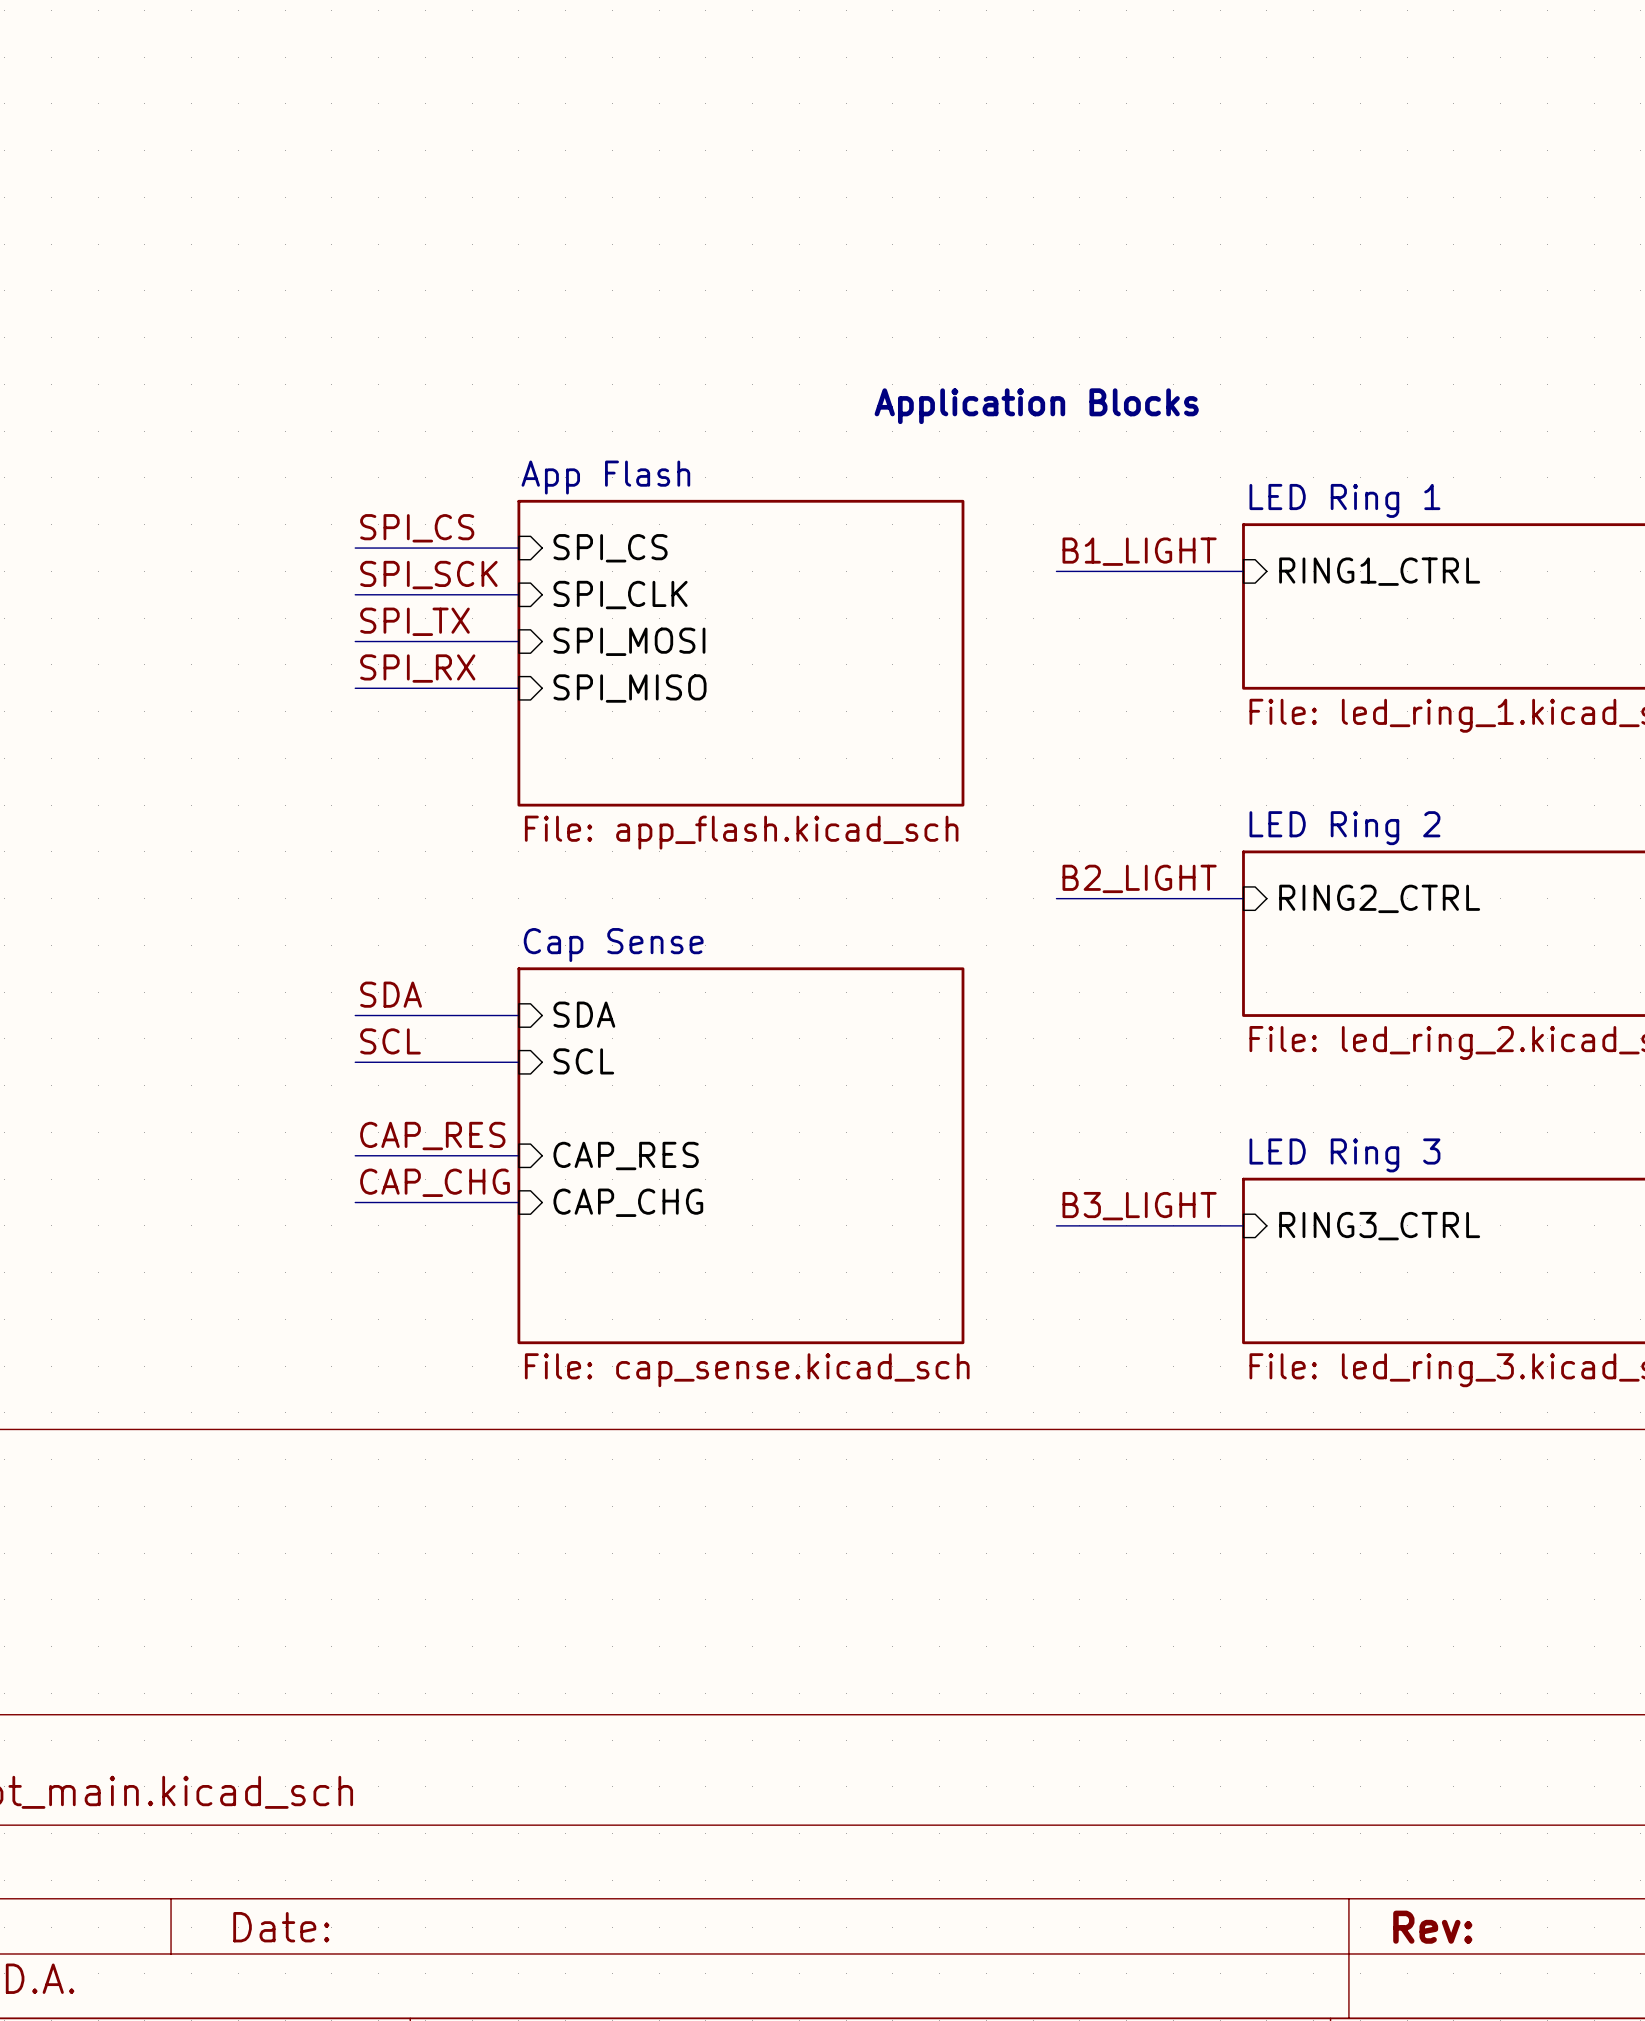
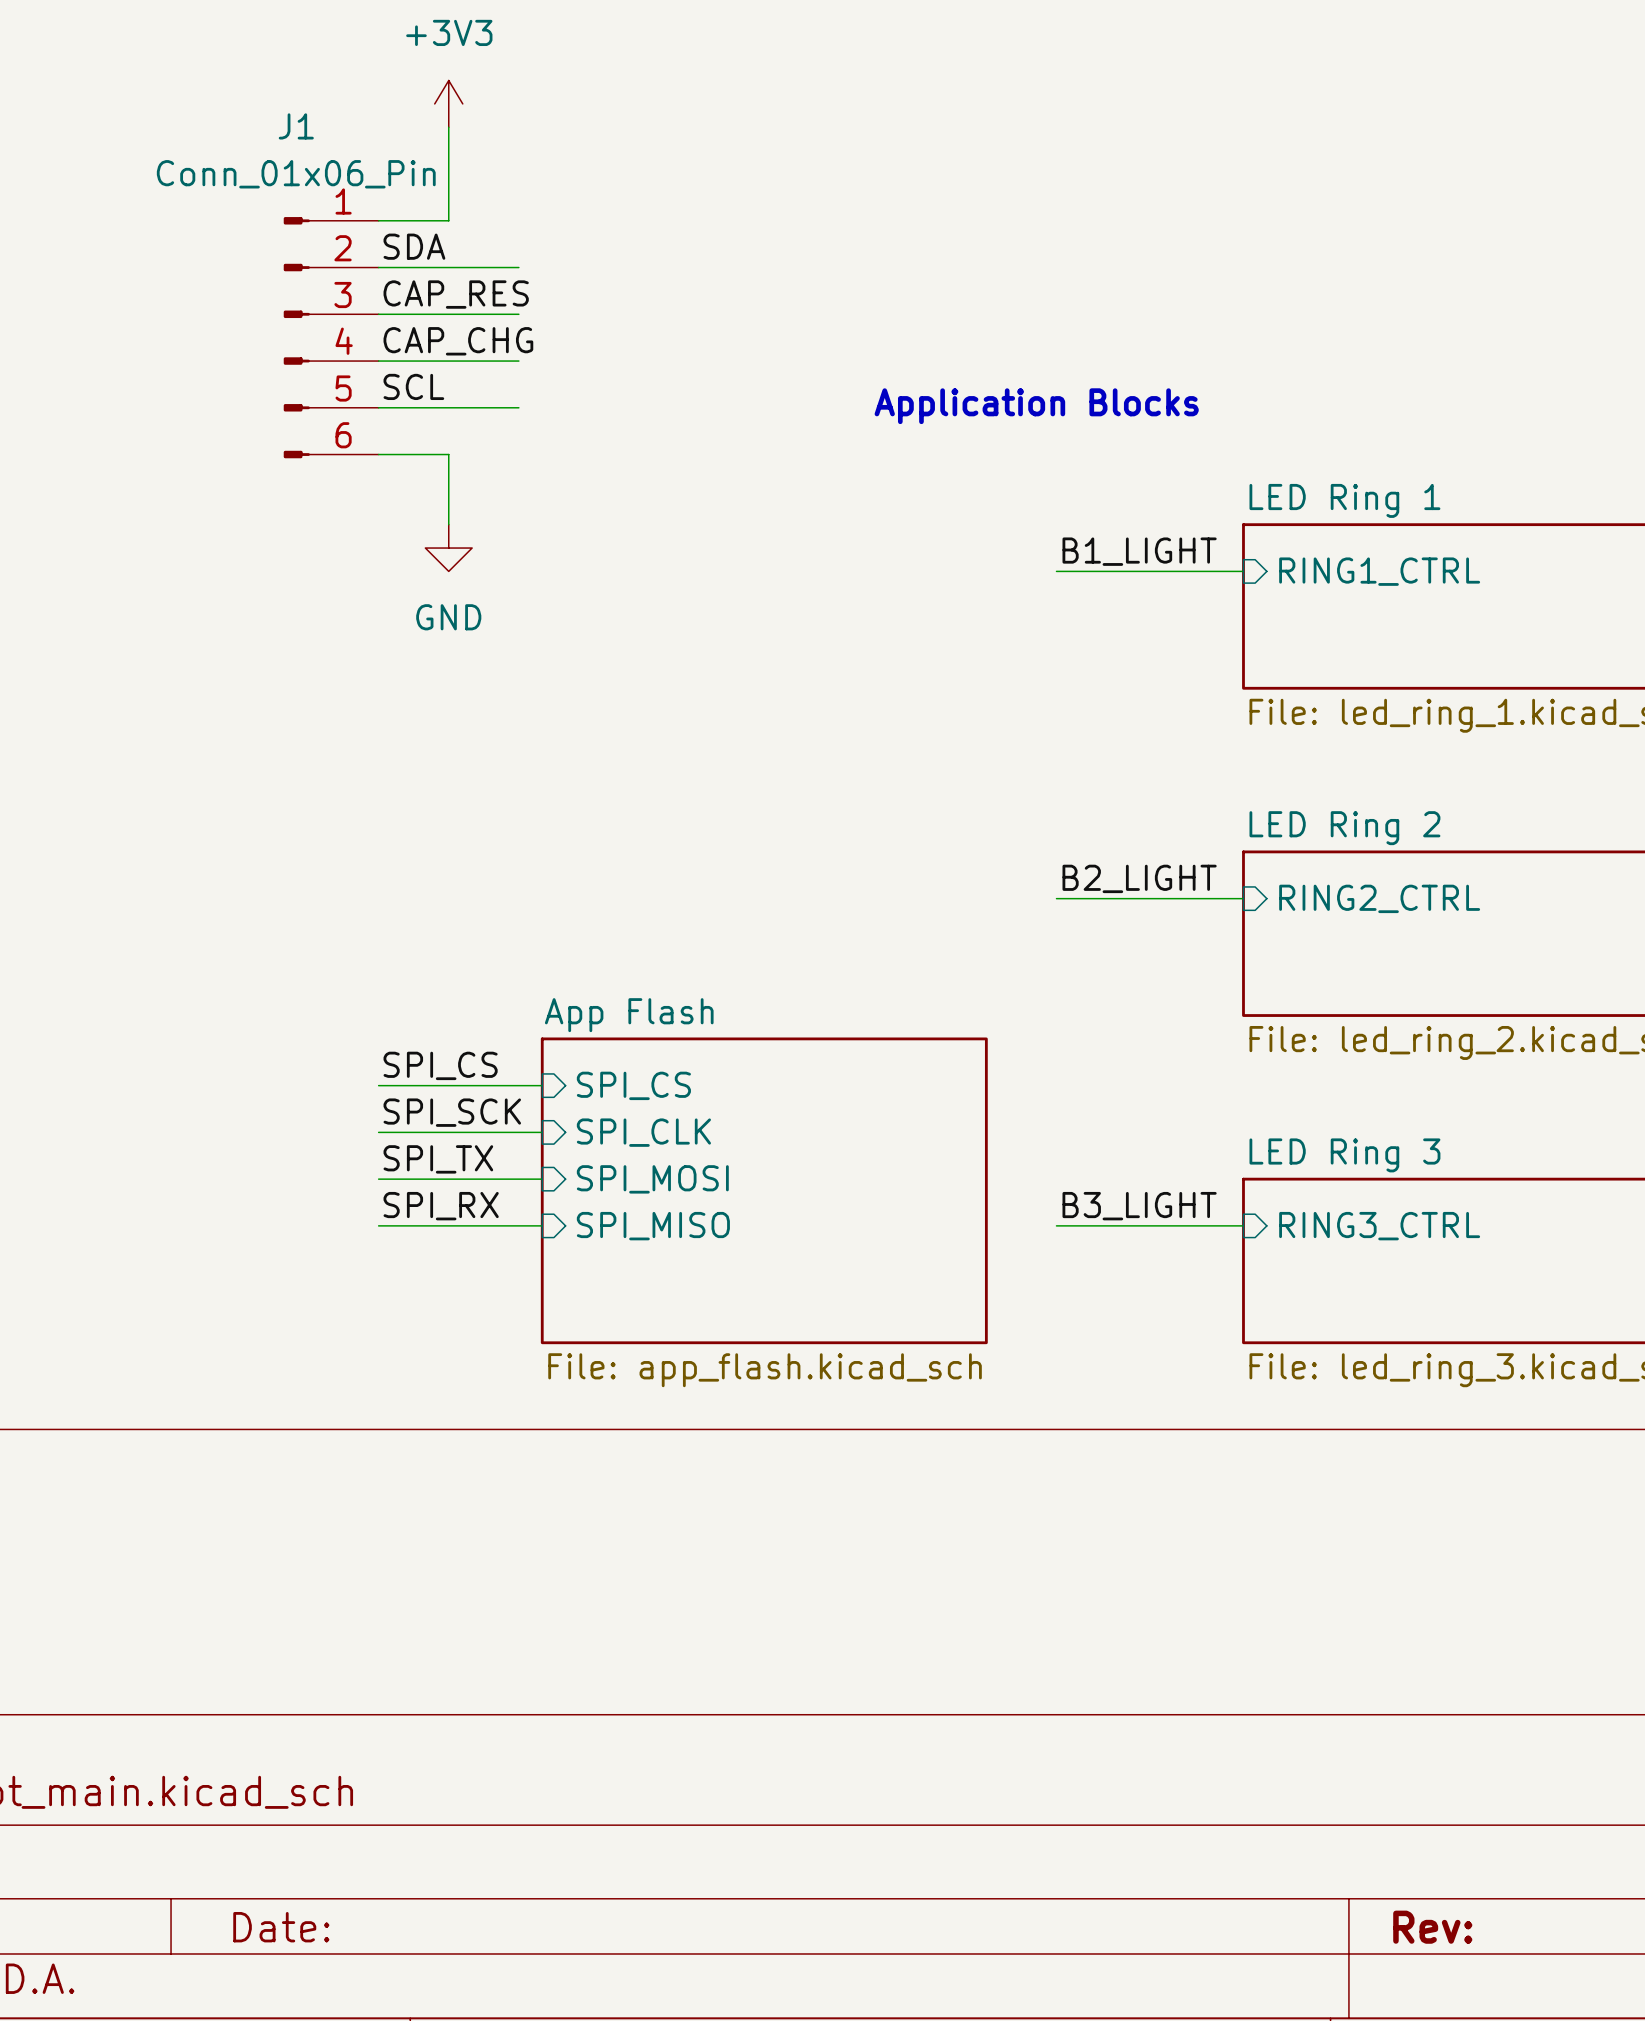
power symbol: none -> +3V3 (448, 103)
wire: none -> (448, 127) (448, 220) (378, 220)
label: none -> SDA (414, 246)
wire: none -> (378, 267) (518, 267)
label: none -> CAP_RES (456, 294)
wire: none -> (378, 314) (518, 314)
J1: none -> Conn_01x06_Pin (331, 337)
label: none -> CAP_CHG (458, 341)
wire: none -> (378, 361) (518, 361)
label: none -> SCL (413, 386)
wire: none -> (378, 407) (518, 407)
wire: none -> (378, 454) (448, 454) (448, 524)
label: SPI_CS (417, 528) -> none
wire: (355, 548) (518, 548) -> none
power symbol: none -> GND (448, 548)
sheet pin: SPI_CS (610, 548) -> none
label: SPI_SCK (428, 575) -> none
wire: (355, 594) (518, 594) -> none
sheet pin: SPI_CLK (620, 595) -> none
label: SPI_TX (414, 621) -> none
wire: (355, 641) (518, 641) -> none
sheet pin: SPI_MOSI (629, 641) -> none
sheet App Flash: File: app_flash.kicad_sch (740, 653) -> none
label: SPI_RX (417, 668) -> none
wire: (355, 688) (518, 688) -> none
sheet pin: SPI_MISO (629, 688) -> none
label: SDA (391, 994) -> none
sheet pin: SDA (584, 1014) -> none
wire: (355, 1015) (518, 1015) -> (378, 1132) (542, 1132)
label: SCL (390, 1041) -> none
sheet pin: SCL (583, 1061) -> none
wire: (355, 1062) (518, 1062) -> (378, 1085) (542, 1085)
label: none -> SPI_CS (440, 1065)
sheet pin: none -> SPI_CS (633, 1085)
label: none -> SPI_SCK (452, 1112)
sheet pin: none -> SPI_CLK (643, 1132)
label: CAP_RES (432, 1136) -> none
wire: (355, 1155) (518, 1155) -> (378, 1179) (542, 1179)
sheet Cap Sense: File: cap_sense.kicad_sch (740, 1155) -> none
sheet pin: CAP_RES (626, 1156) -> none
label: none -> SPI_TX (438, 1159)
sheet pin: none -> SPI_MOSI (652, 1179)
label: CAP_CHG (435, 1182) -> none
sheet App Flash: none -> File: app_flash.kicad_sch (764, 1190)
wire: (355, 1202) (518, 1202) -> (378, 1225) (542, 1225)
sheet pin: CAP_CHG (628, 1202) -> none
label: none -> SPI_RX (441, 1206)
sheet pin: none -> SPI_MISO (653, 1226)

